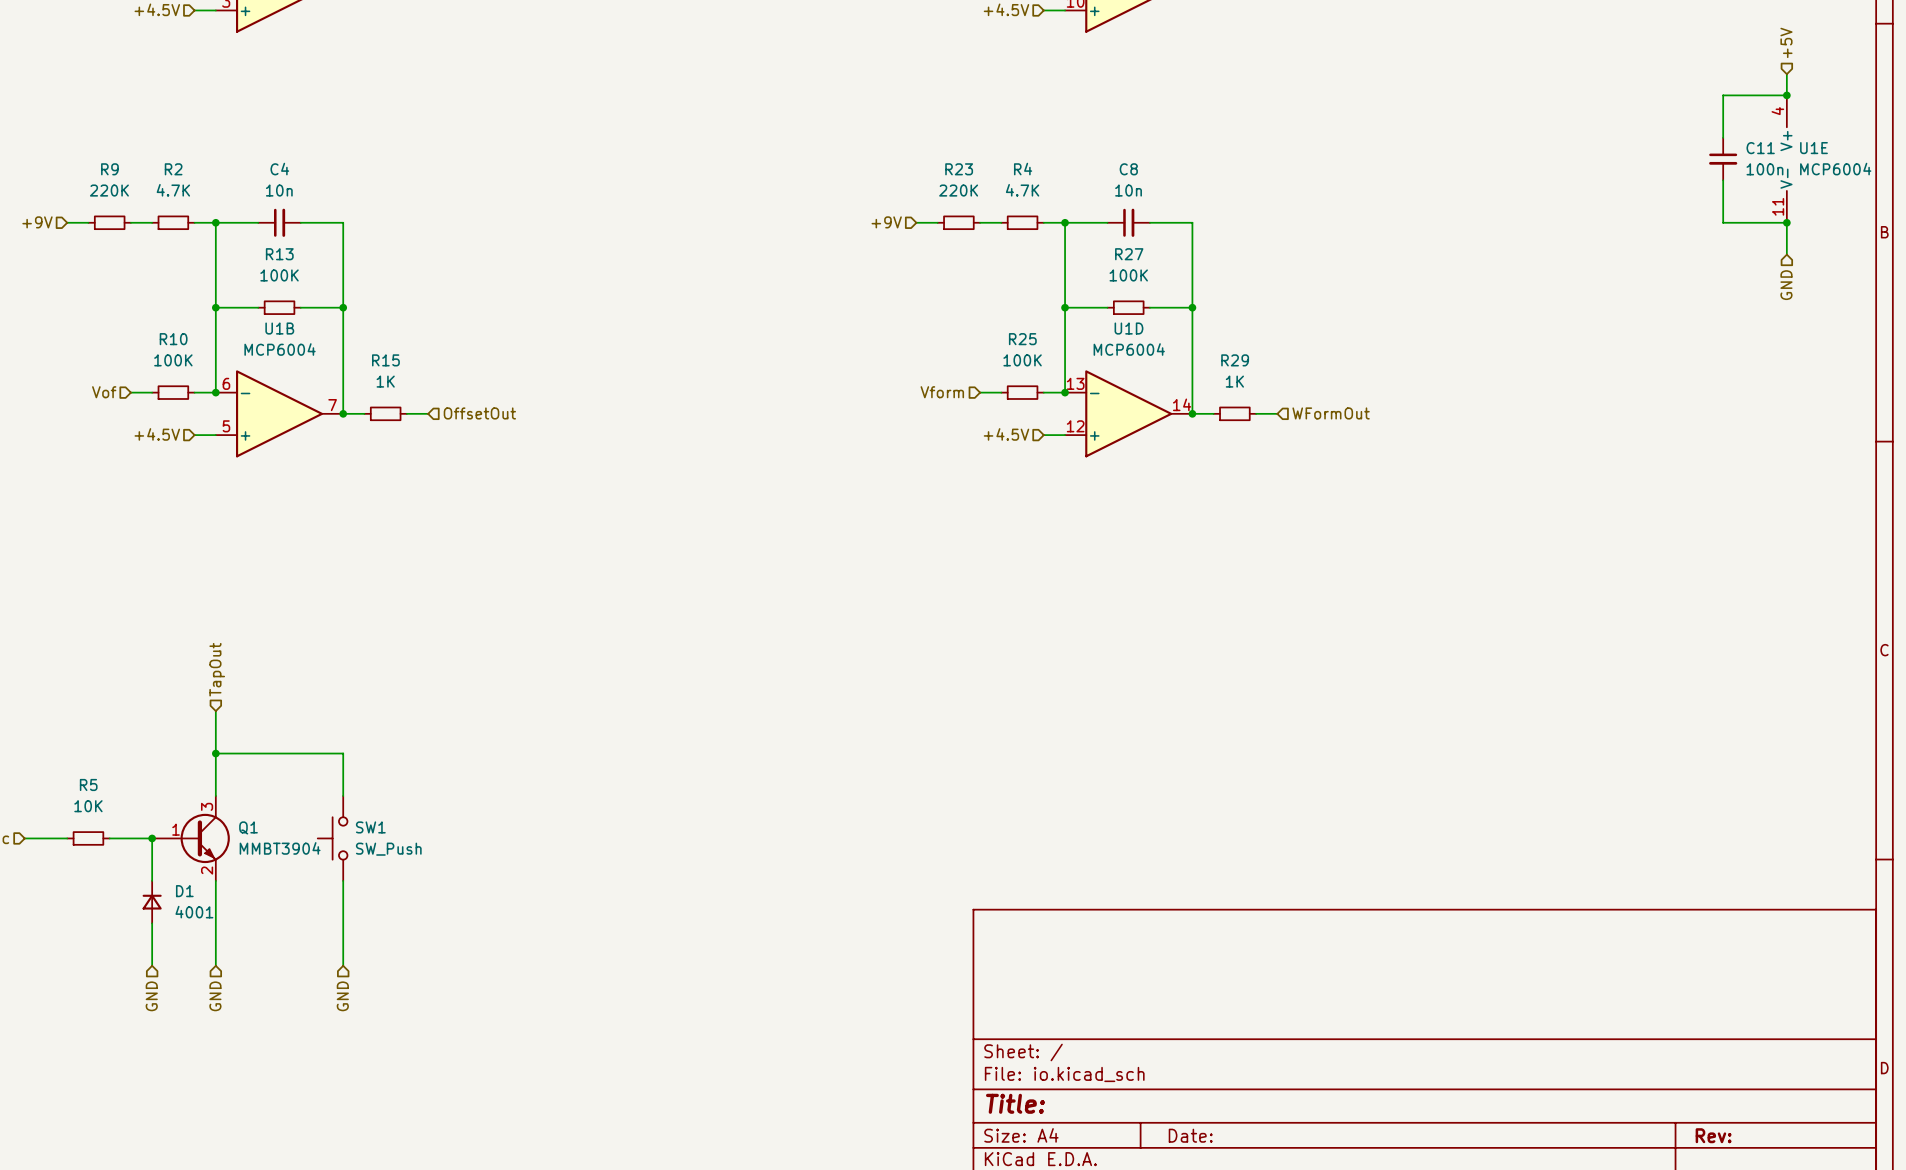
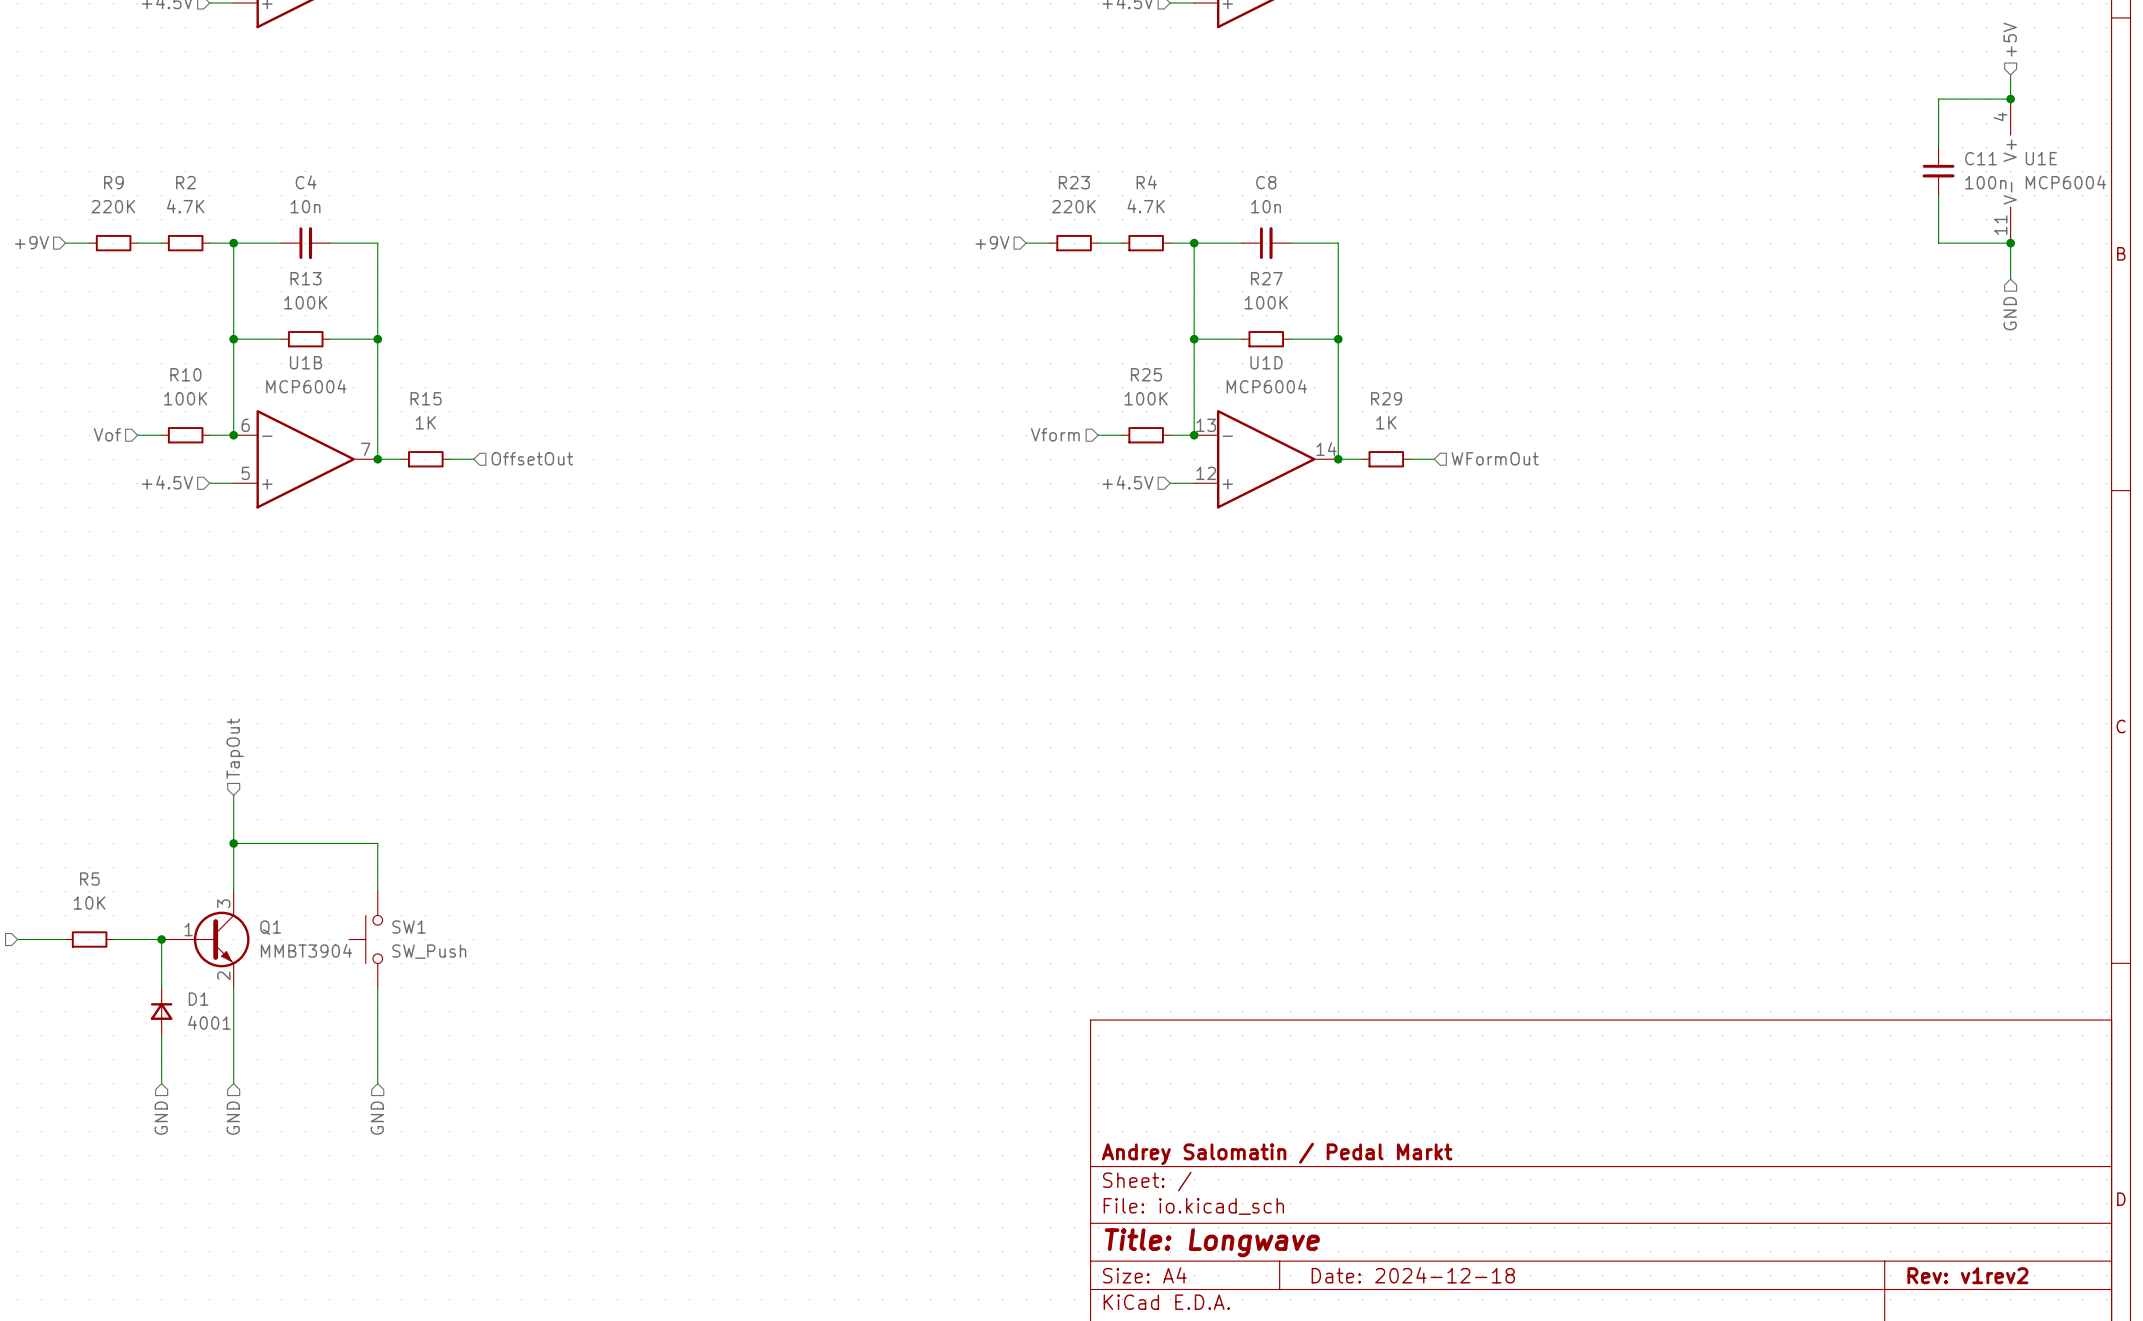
title block: none -> Andrey Salomatin / Pedal Markt (1277, 1153)
title block: Title: (1015, 1103) -> Title: Longwave (1212, 1242)
title block: Date: (1190, 1135) -> Date: 2024-12-18 (1413, 1275)
title block: Rev: (1713, 1135) -> Rev: v1rev2 (1967, 1275)

